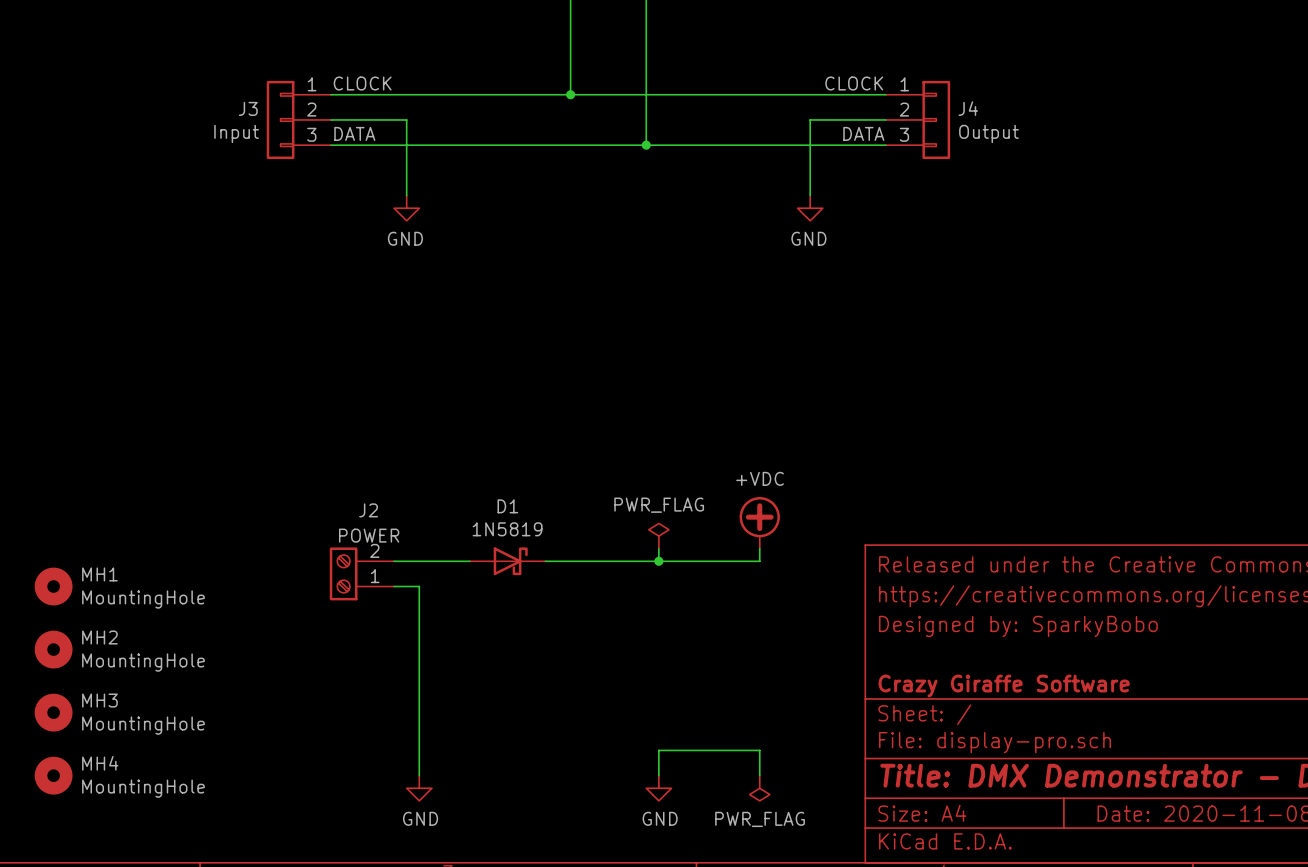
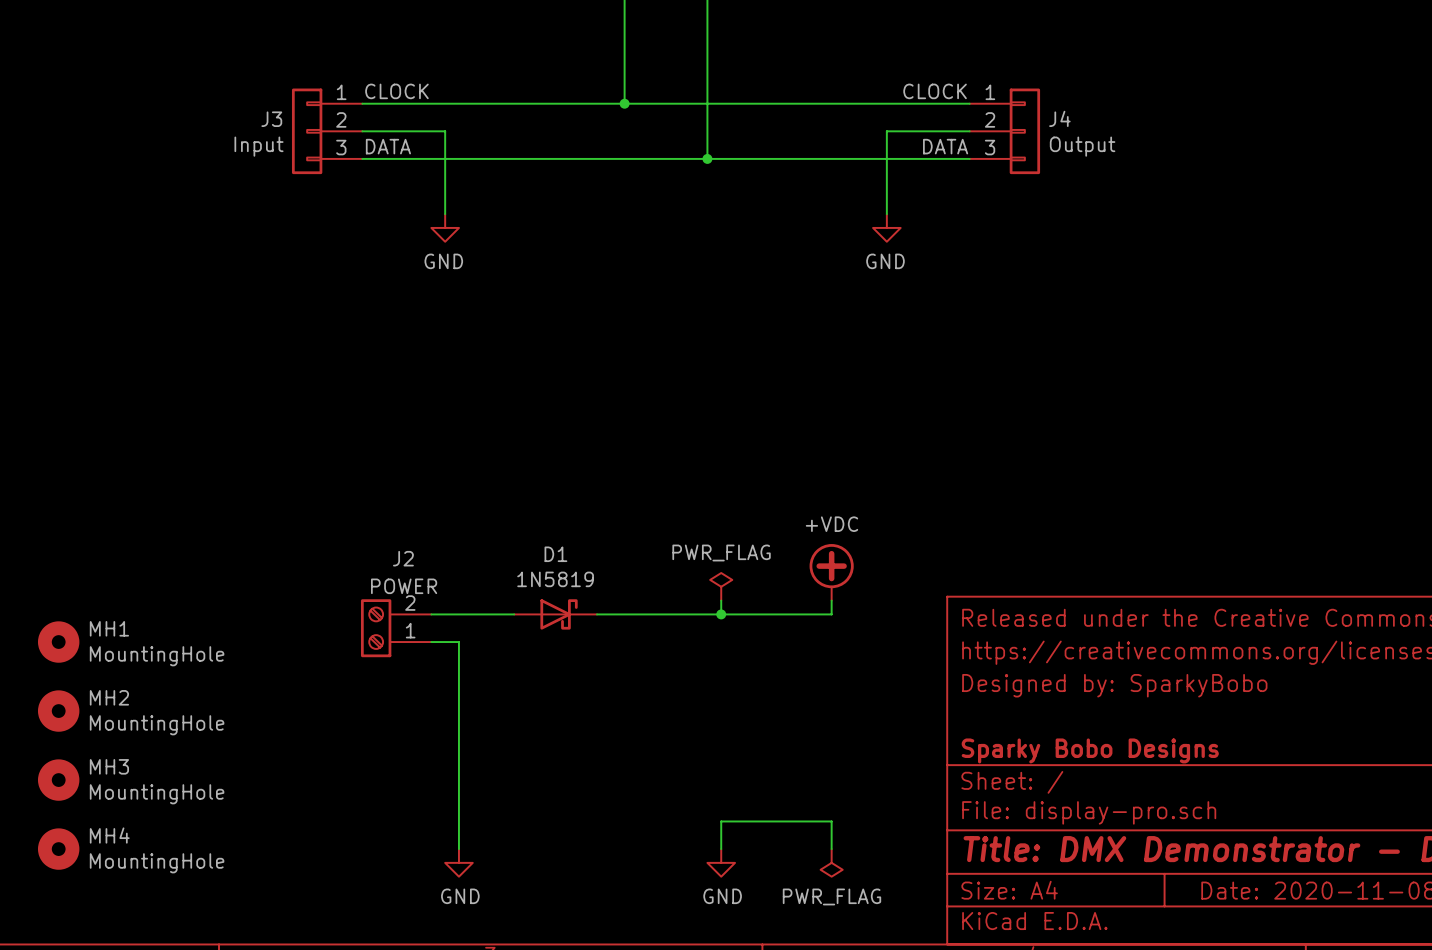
title block: Crazy Giraffe Software (1004, 686) -> Sparky Bobo Designs (1090, 750)

